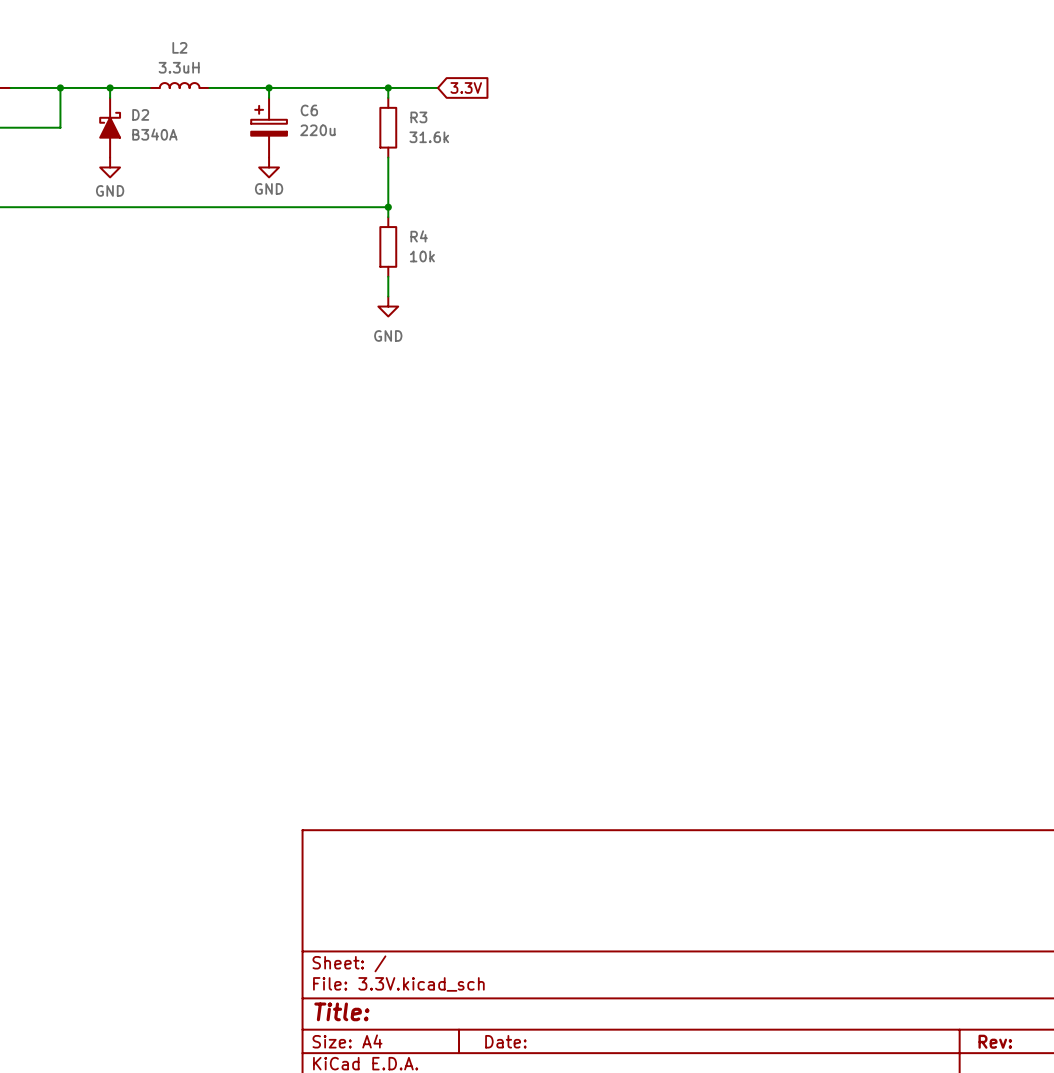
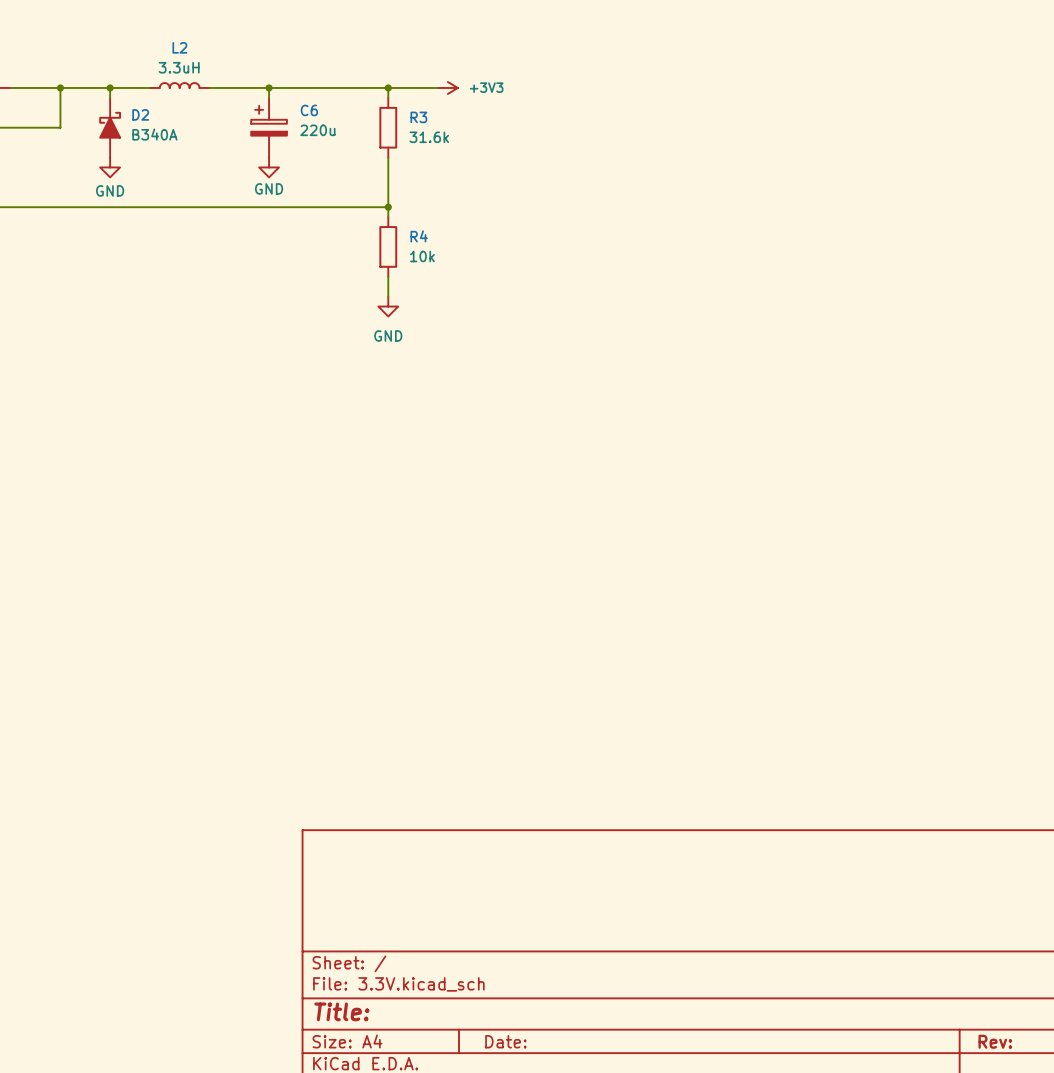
power symbol: none -> +3V3 (447, 87)
global label: 3.3V (466, 87) -> none

